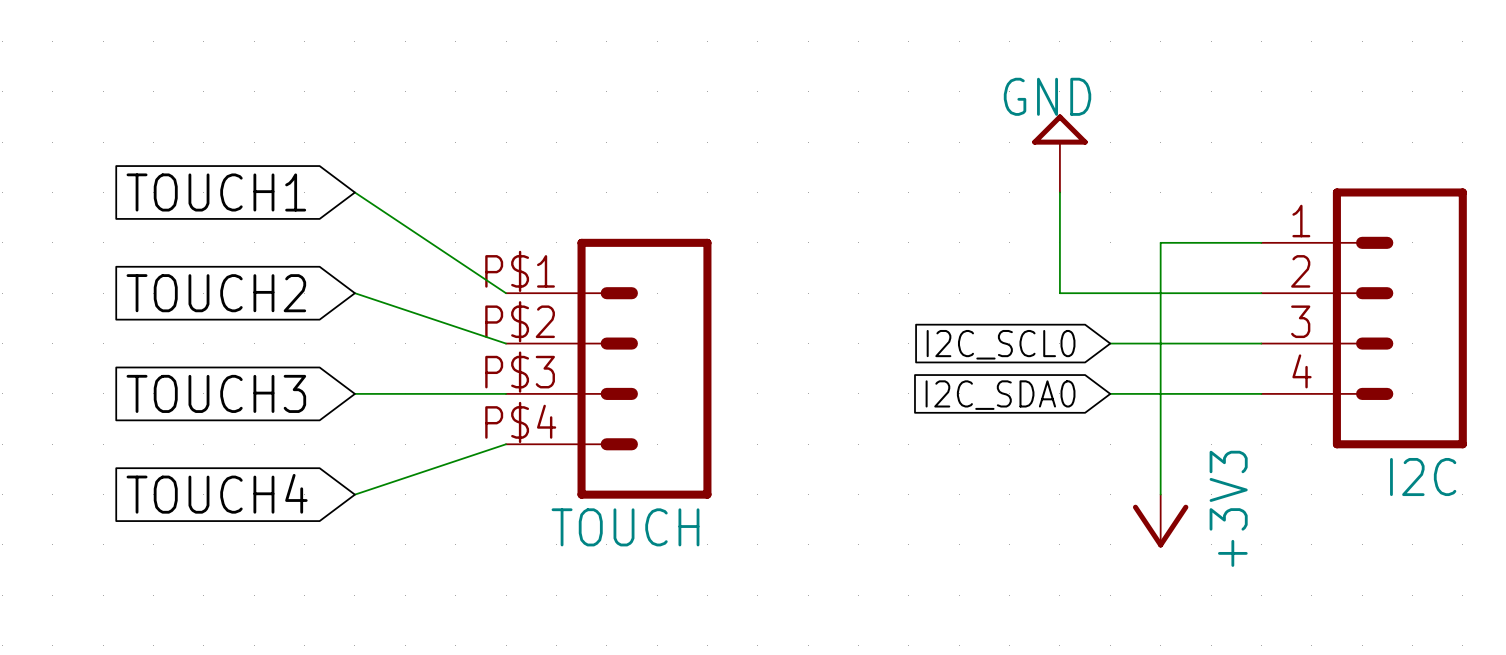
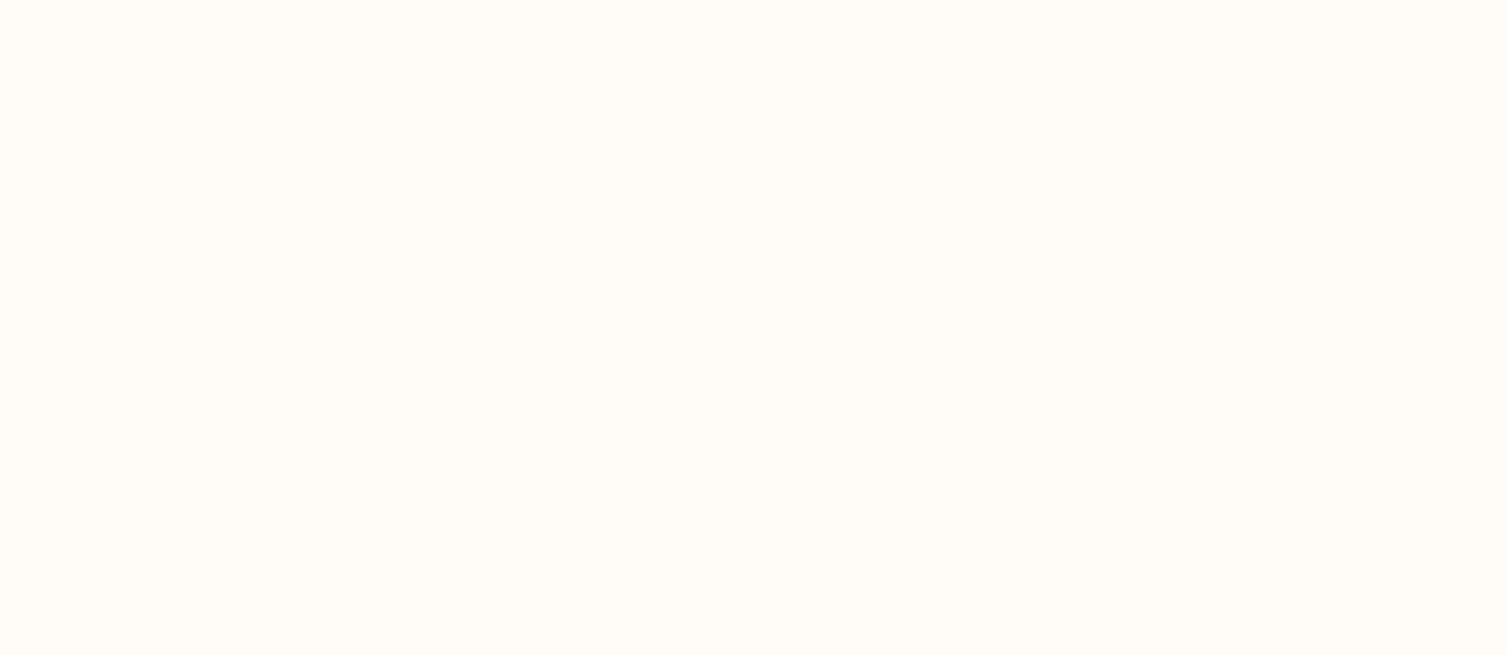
power symbol: GND (1059, 153) -> none
global label: TOUCH1 (216, 192) -> none
wire: (354, 192) (506, 293) -> none
wire: (1059, 192) (1059, 293) (1261, 293) -> none
wire: (1261, 242) (1160, 242) (1160, 494) -> none
global label: TOUCH2 (216, 293) -> none
wire: (354, 293) (506, 343) -> none
I2C: (1364, 318) -> none
wire: (1110, 343) (1261, 343) -> none
global label: I2C_SCL0 (1001, 344) -> none
TOUCH: (608, 368) -> none
global label: TOUCH3 (216, 393) -> none
wire: (354, 393) (506, 393) -> none
wire: (1110, 393) (1261, 393) -> none
global label: I2C_SDA0 (1000, 395) -> none
wire: (506, 444) (354, 494) -> none
global label: TOUCH4 (217, 493) -> none
power symbol: +3V3 (1160, 521) -> none

